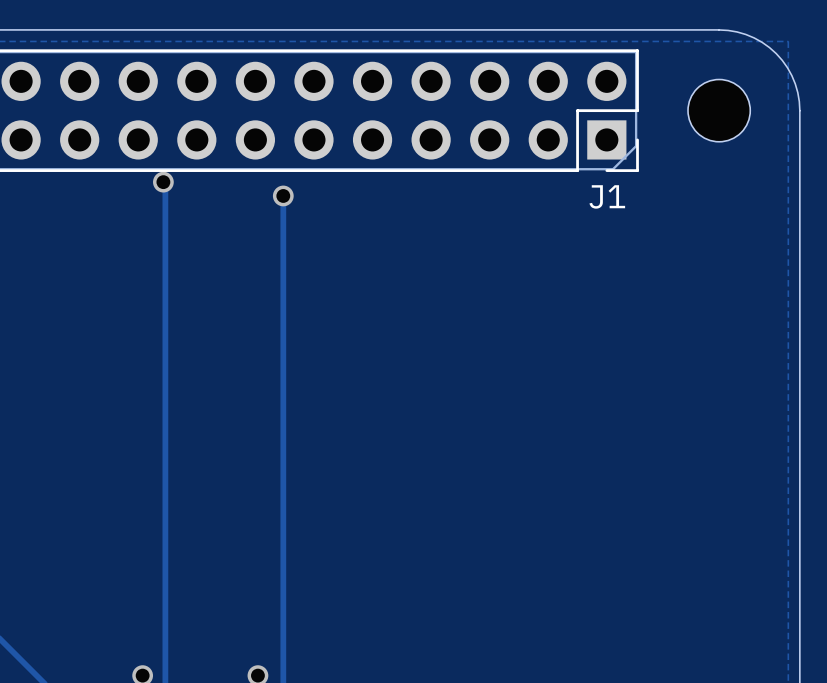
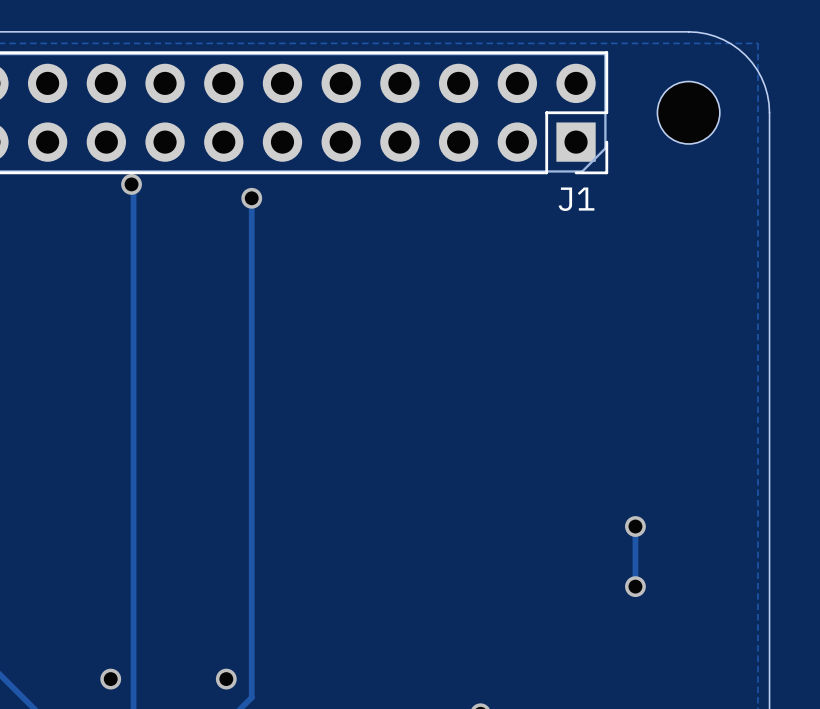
track: none -> (635, 526) (635, 586)
via: none -> (635, 526)
via: none -> (635, 586)

